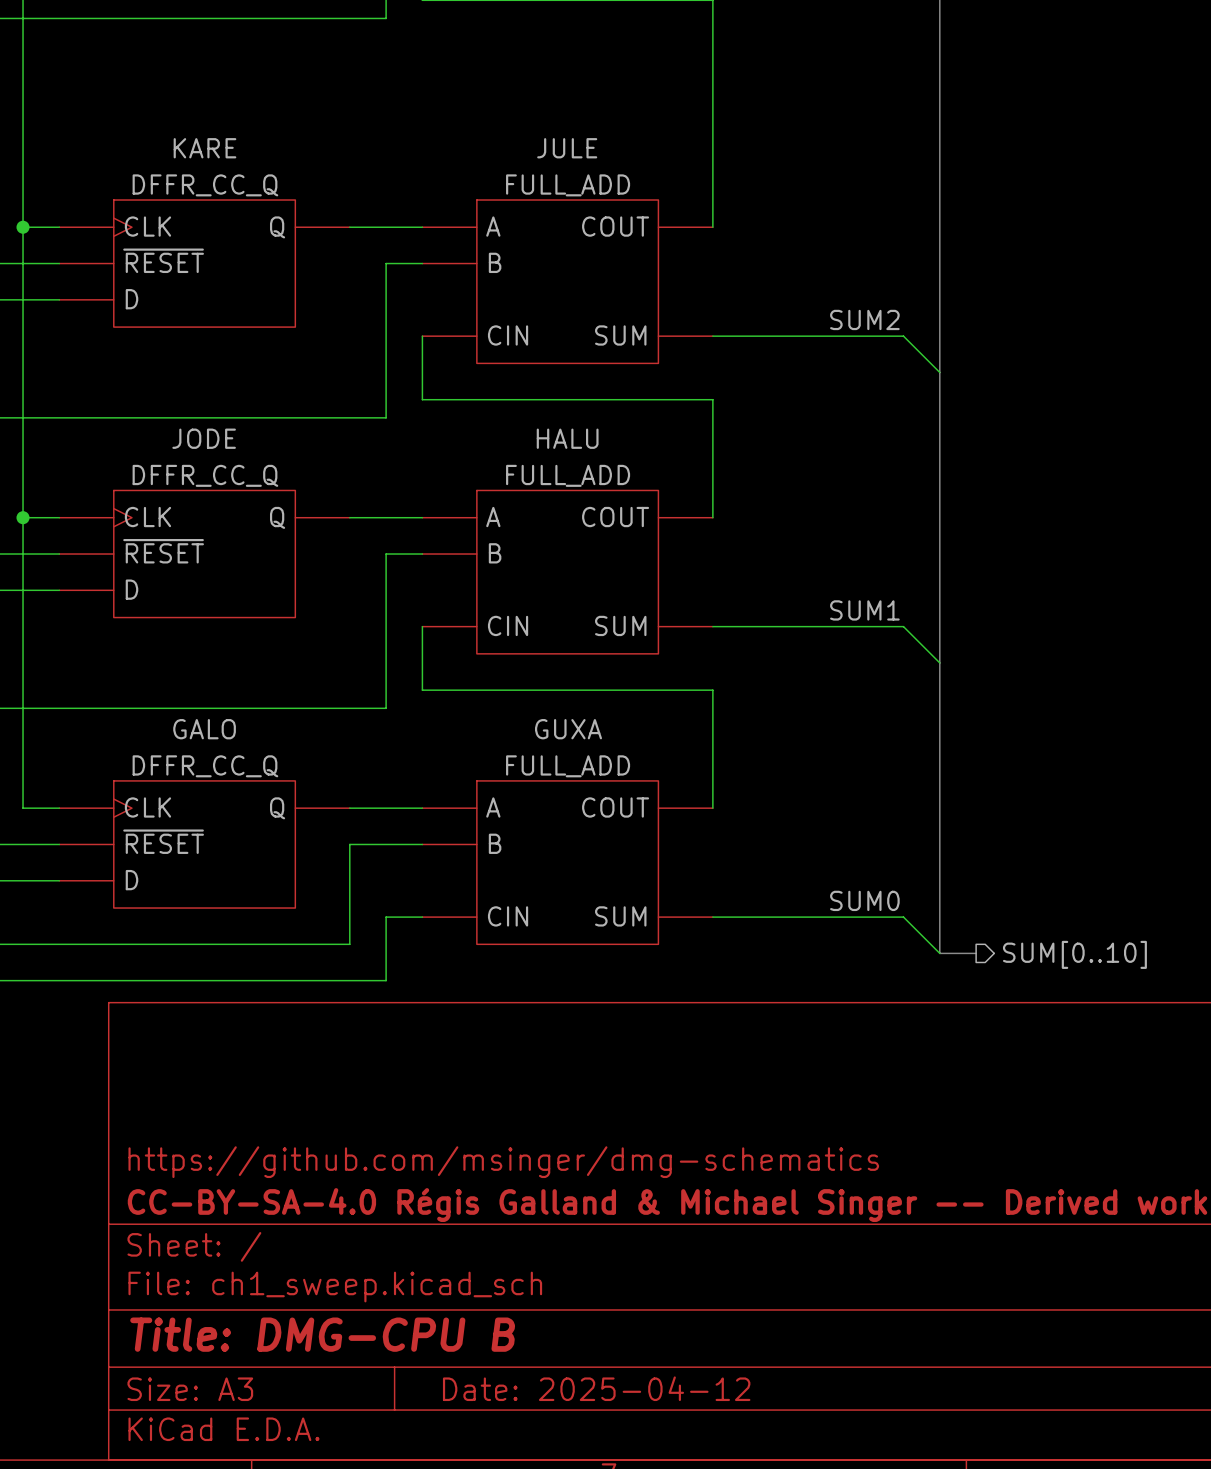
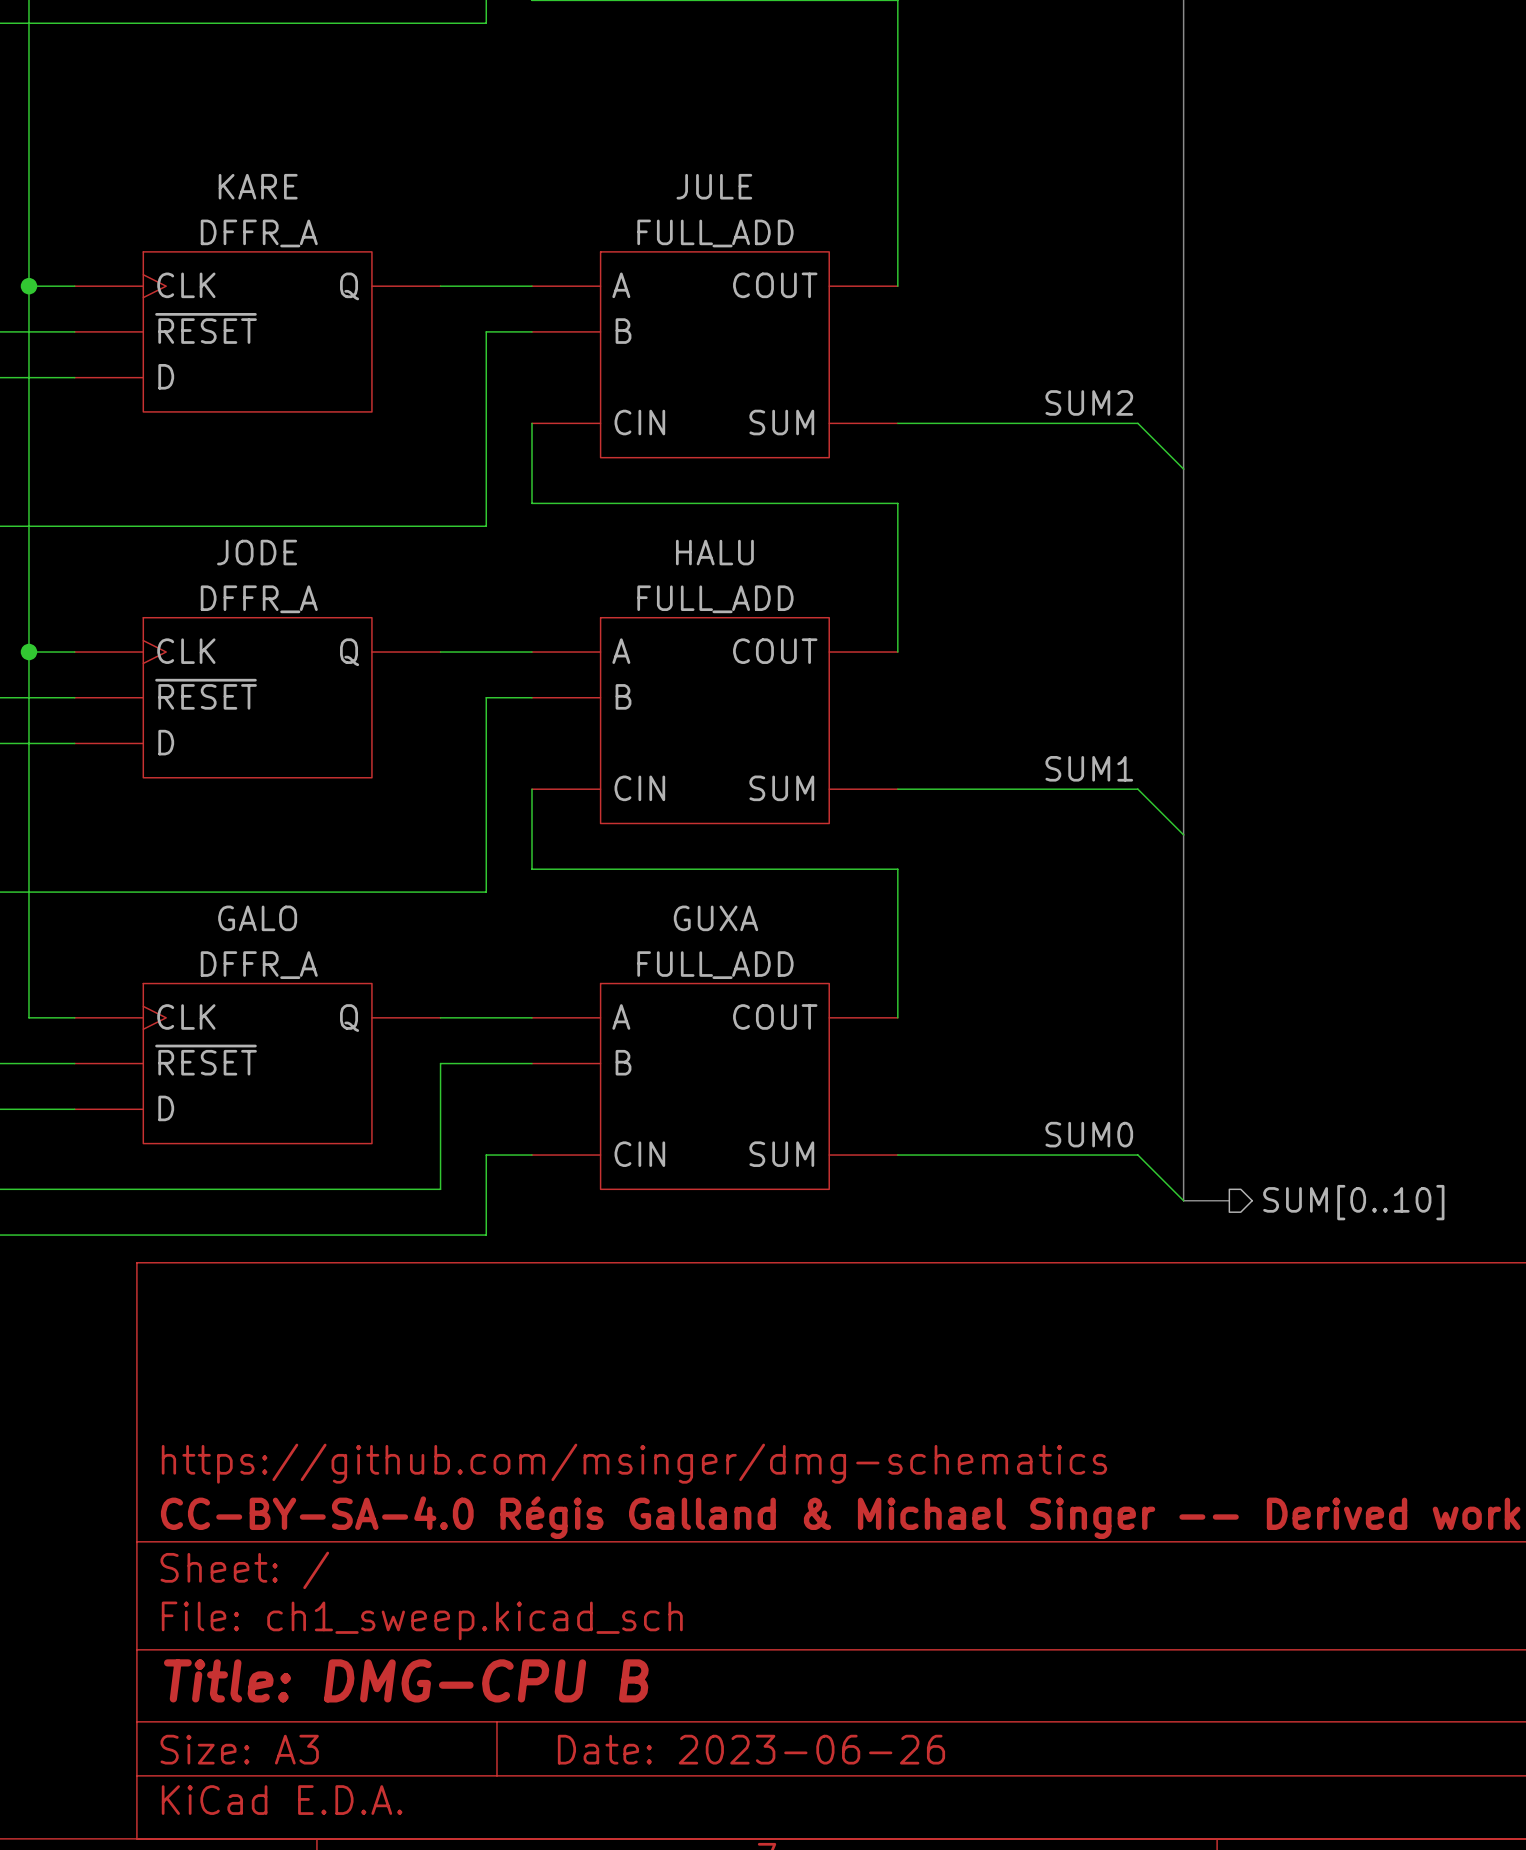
KARE value: DFFR_CC_Q (205, 185) -> DFFR_A (259, 233)
JODE value: DFFR_CC_Q (205, 475) -> DFFR_A (259, 599)
GALO value: DFFR_CC_Q (205, 766) -> DFFR_A (259, 965)
title block: Date: 2025-04-12 (596, 1388) -> Date: 2023-06-26 (751, 1749)

